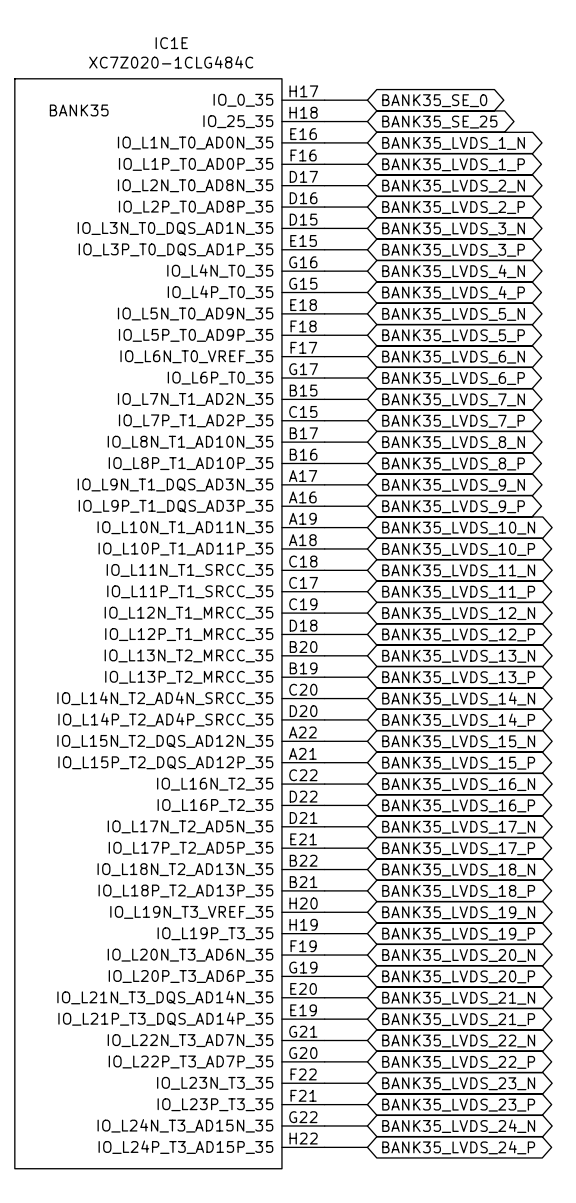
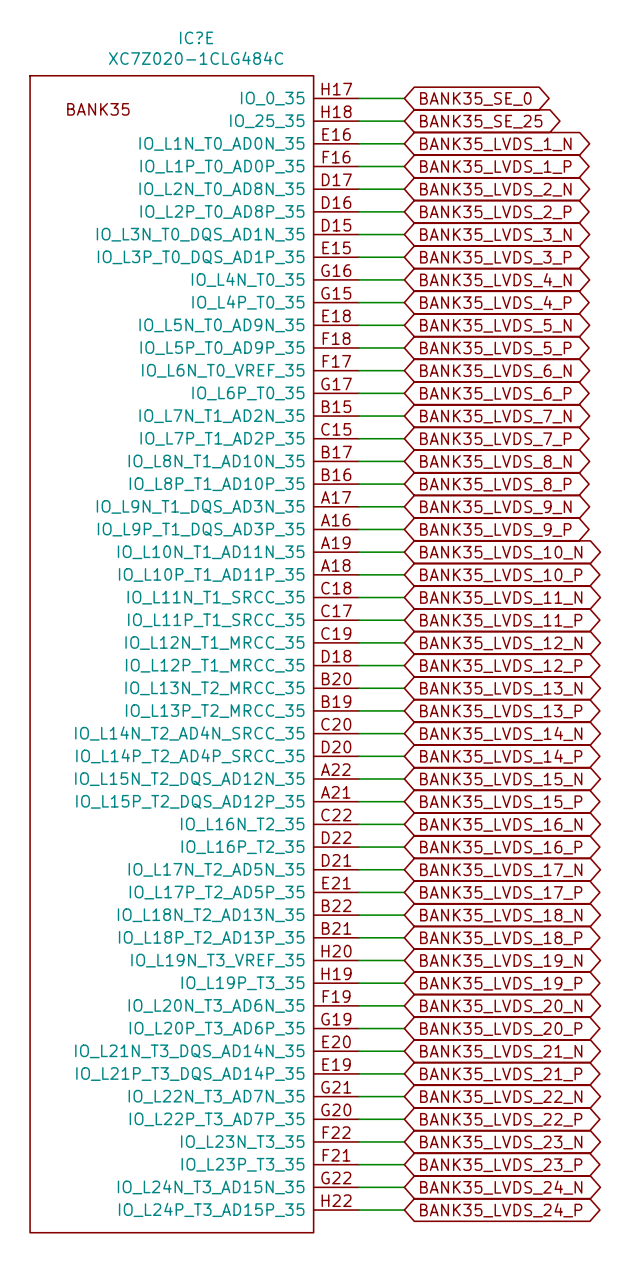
IC1E name: IC1E (171, 43) -> IC?E (196, 37)

